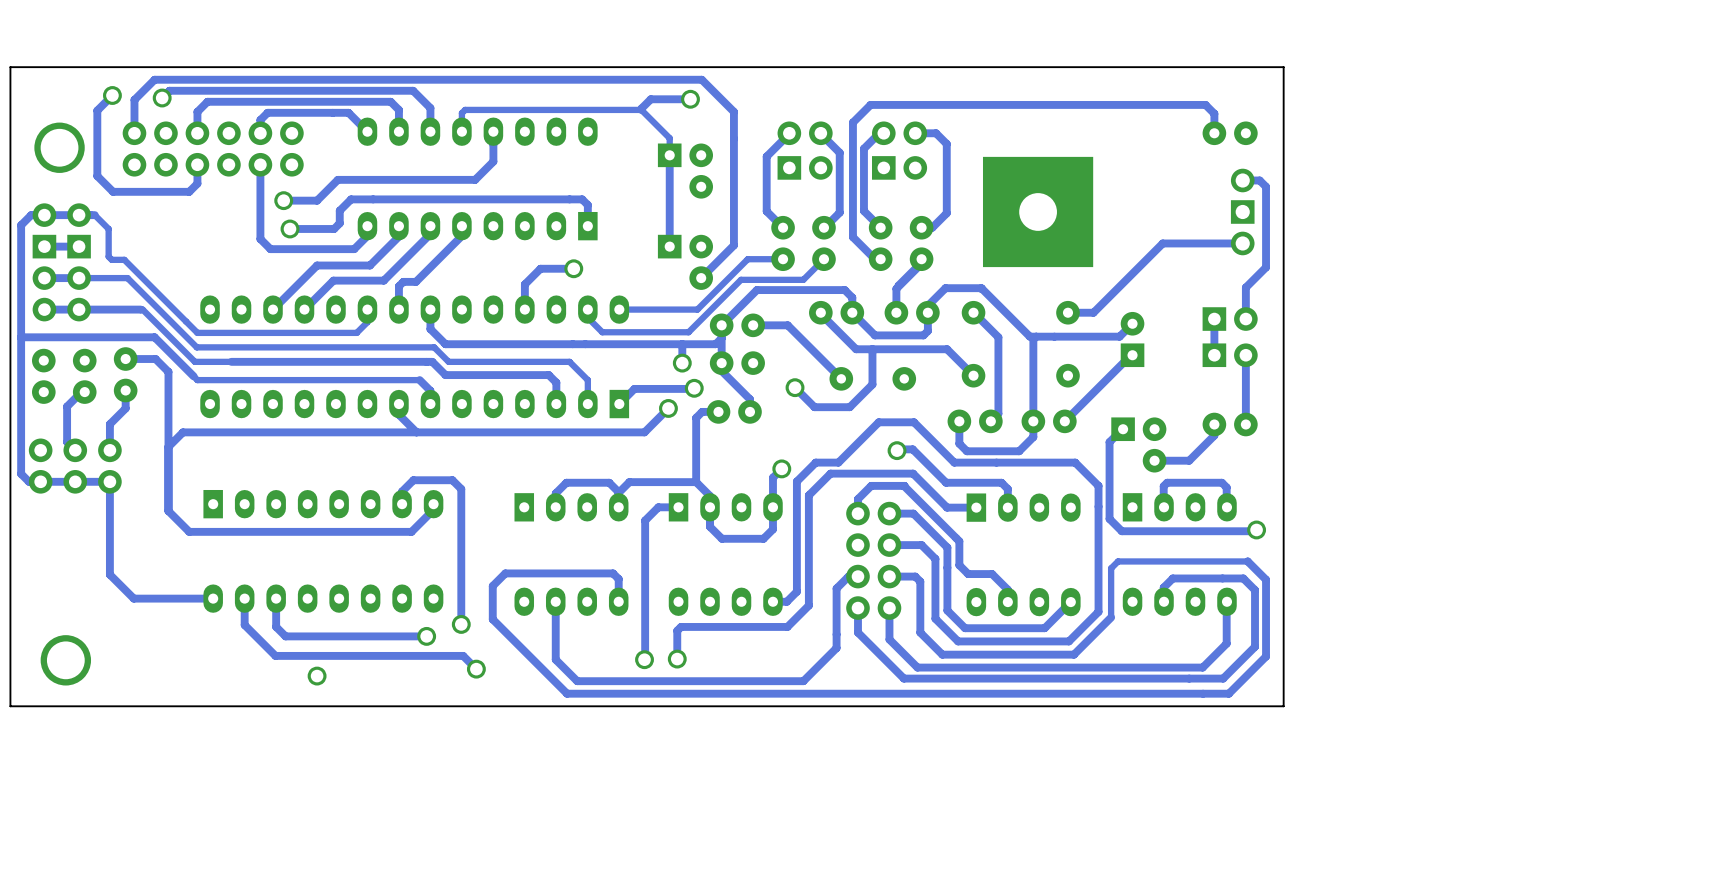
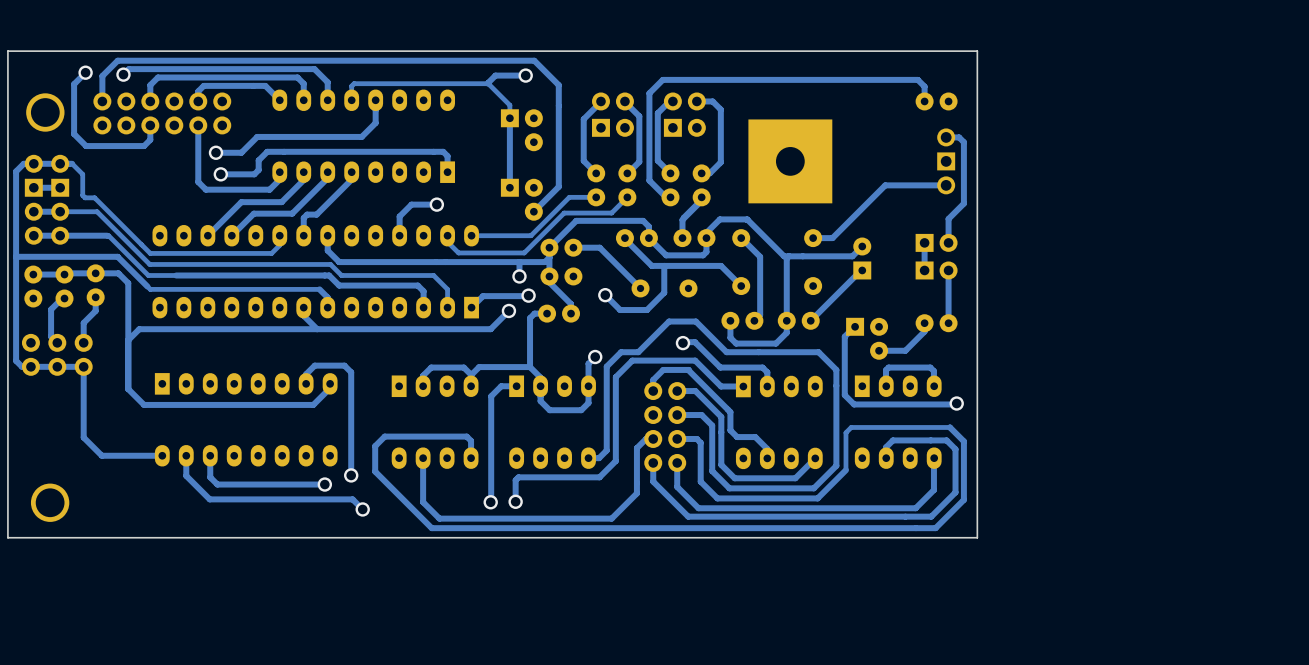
track: none -> (95, 273) (33, 274)
via: (317, 676) -> none

